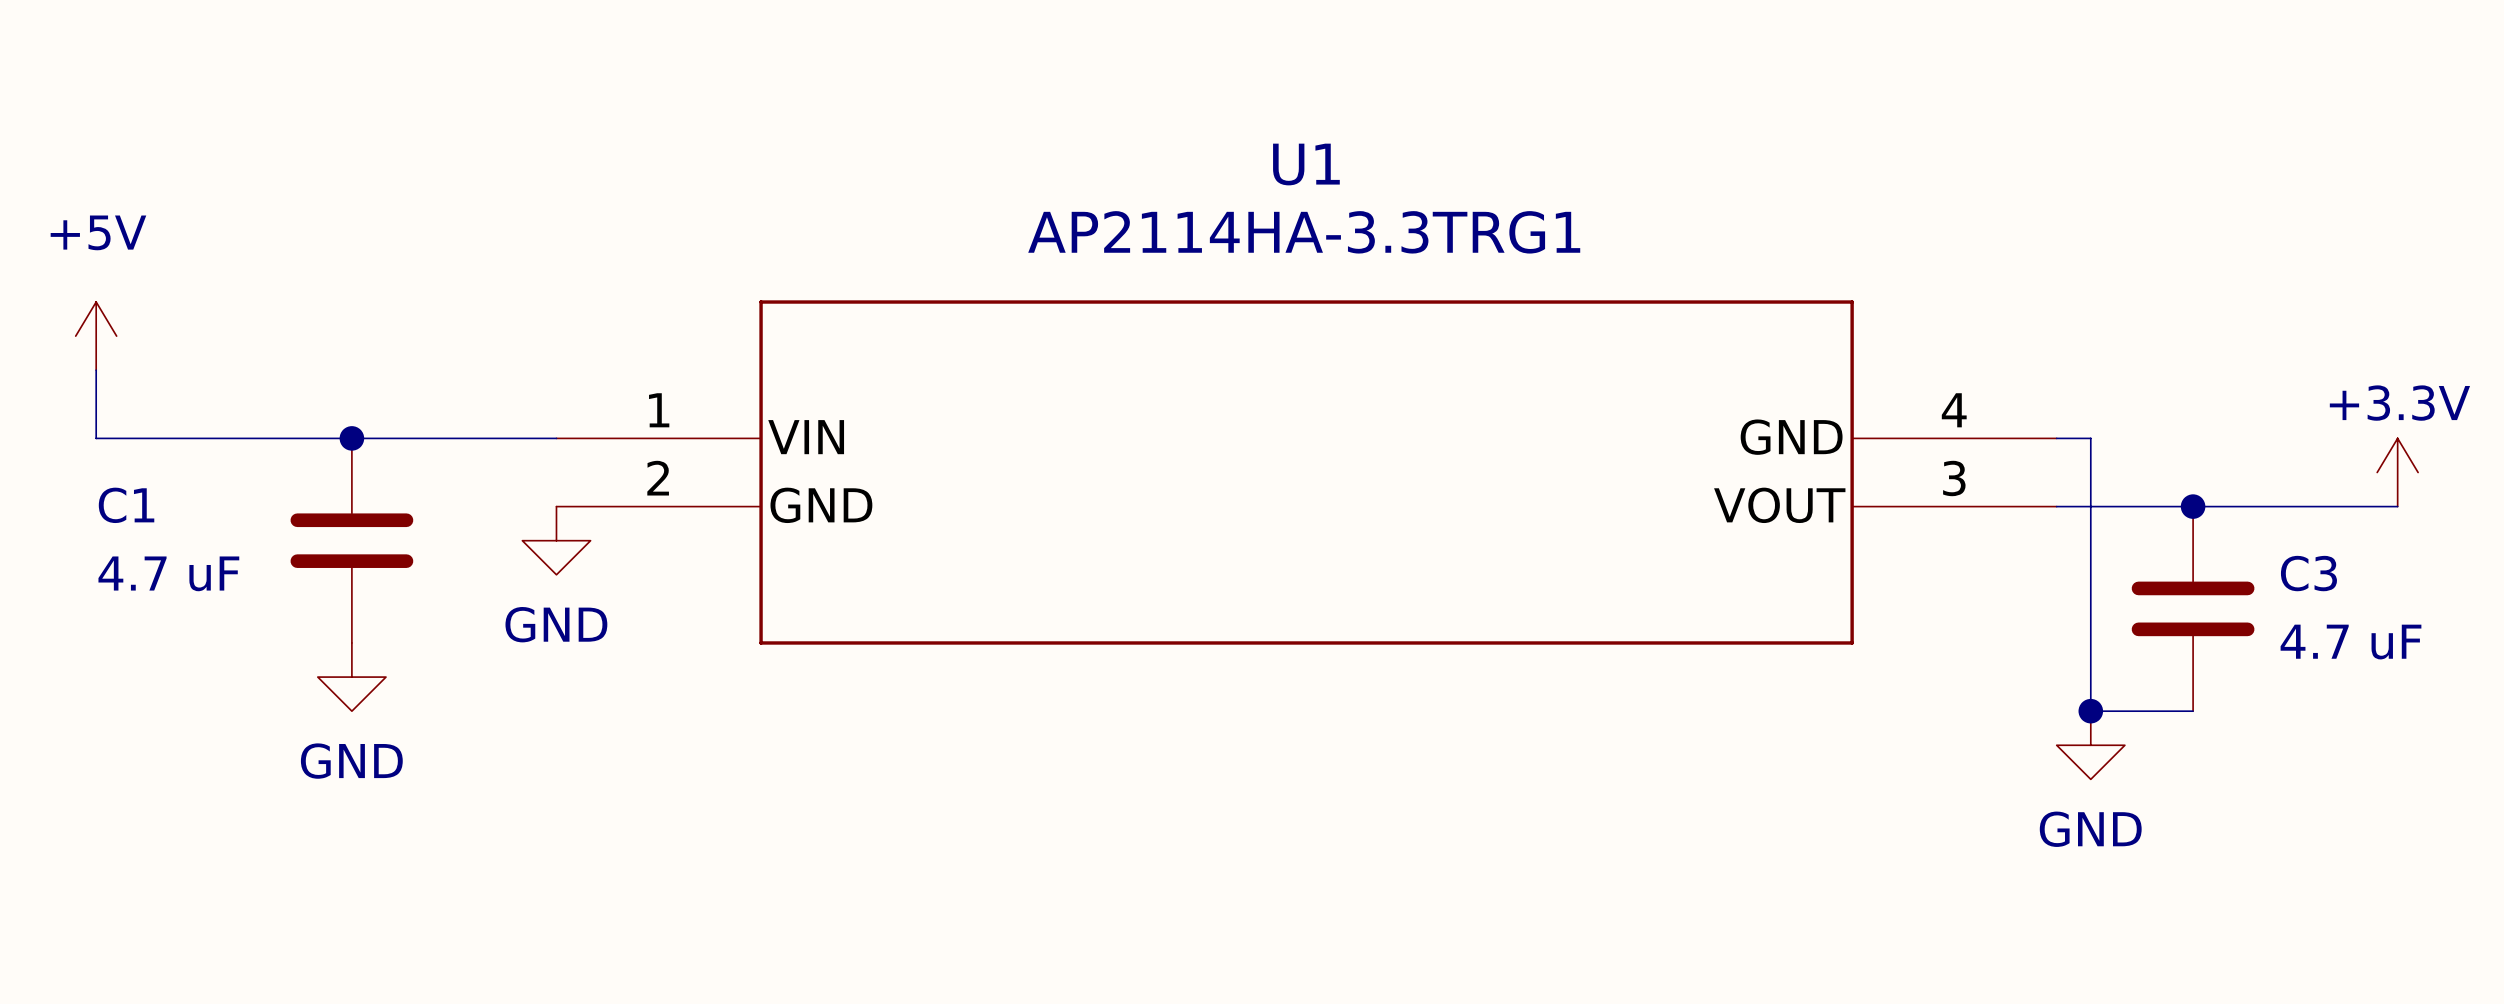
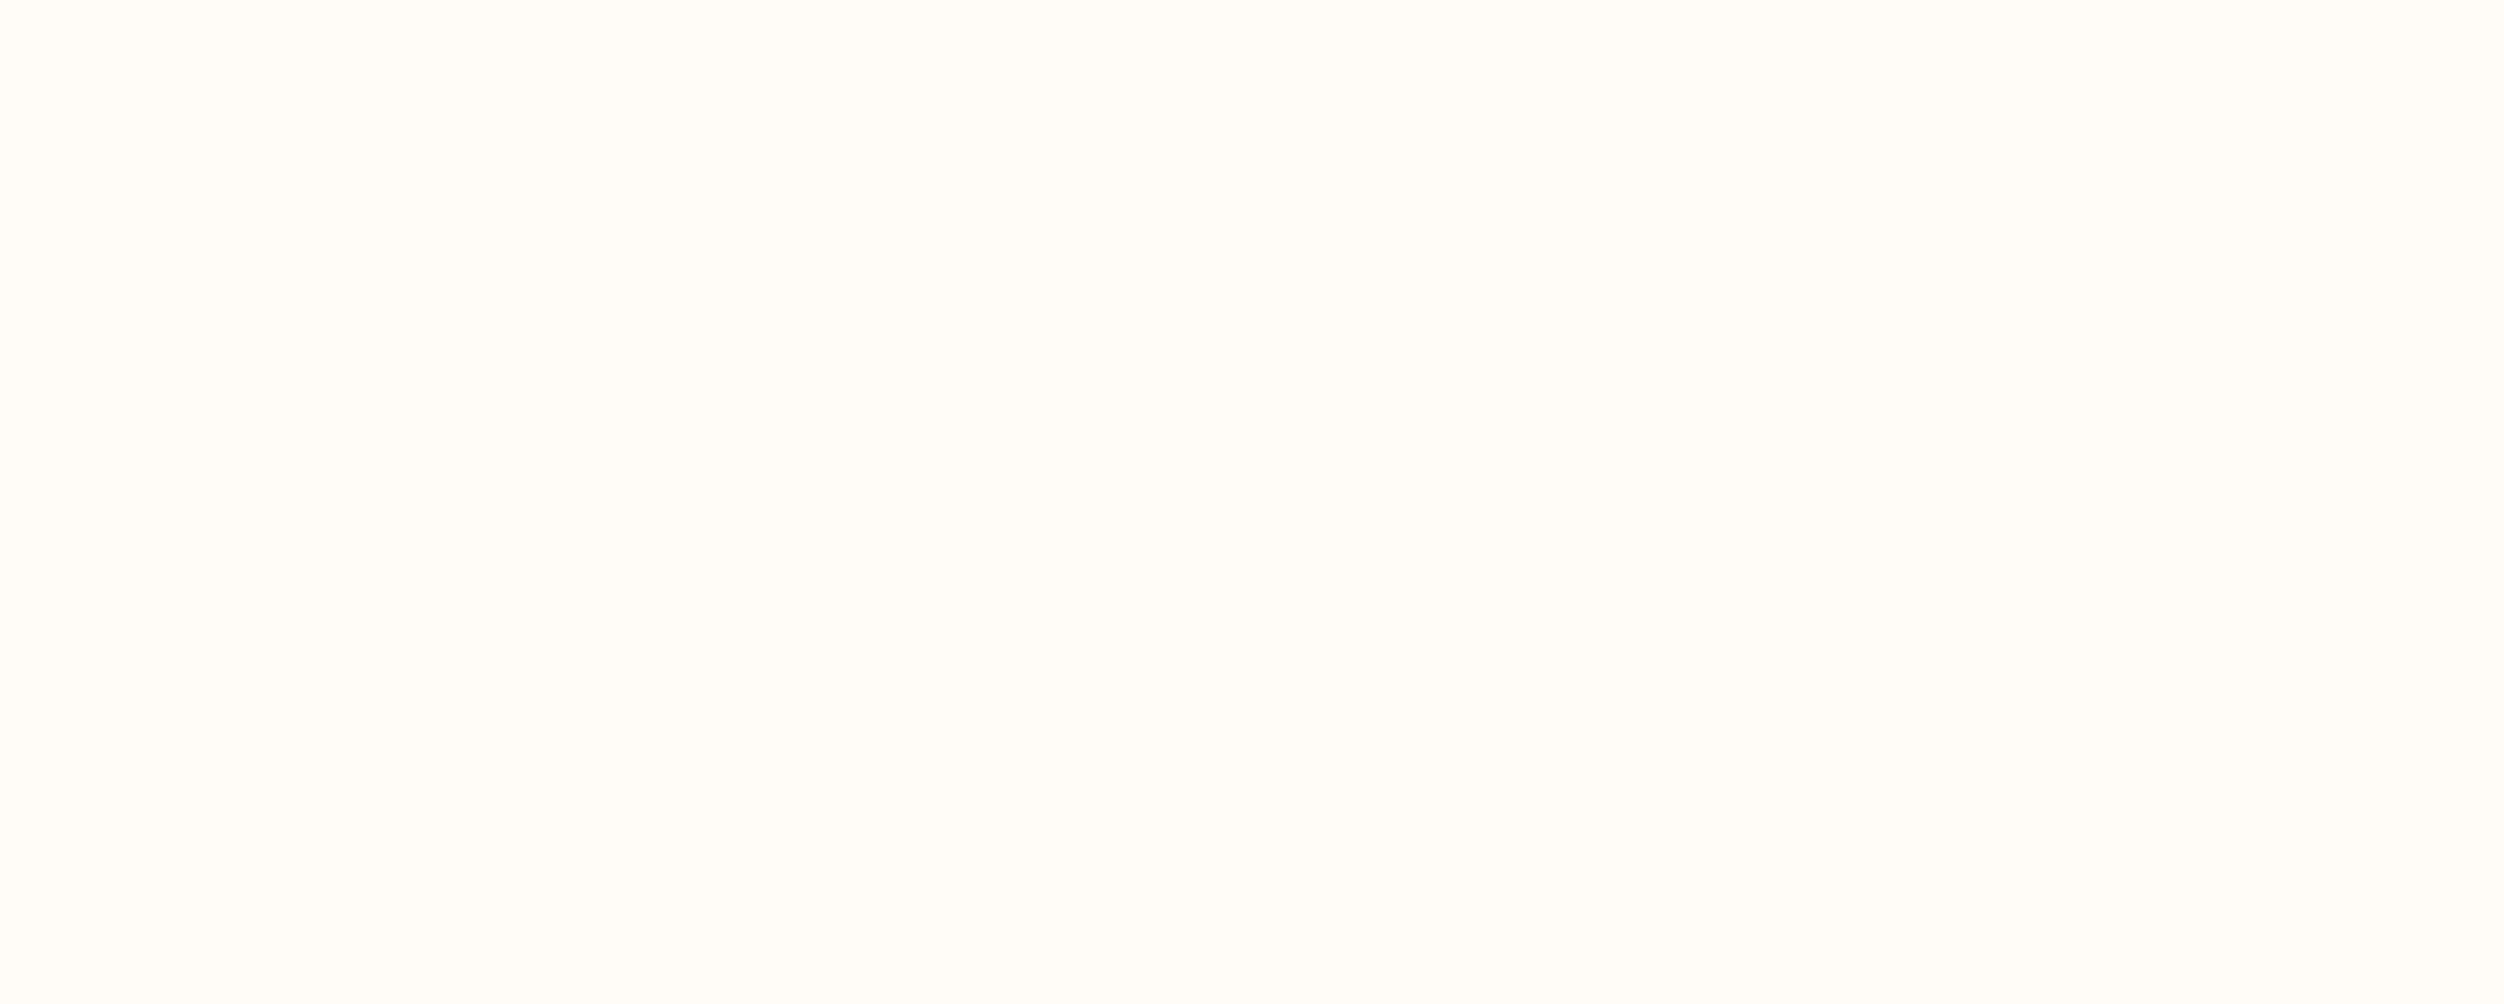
power symbol: +5V (96, 336) -> none
wire: (96, 370) (96, 438) (556, 438) -> none
junction: (351, 438) -> none
wire: (2056, 438) (2090, 438) (2090, 711) (2193, 711) -> none
U1: AP2114HA-3.3TRG1 (1306, 472) -> none
power symbol: +3.3V (2397, 472) -> none
wire: (2056, 506) (2397, 506) -> none
junction: (2193, 506) -> none
C1: 4.7 uF (351, 540) -> none
power symbol: GND (556, 540) -> none
C3: 4.7 uF (2193, 608) -> none
power symbol: GND (351, 677) -> none
junction: (2090, 711) -> none
power symbol: GND (2090, 745) -> none

